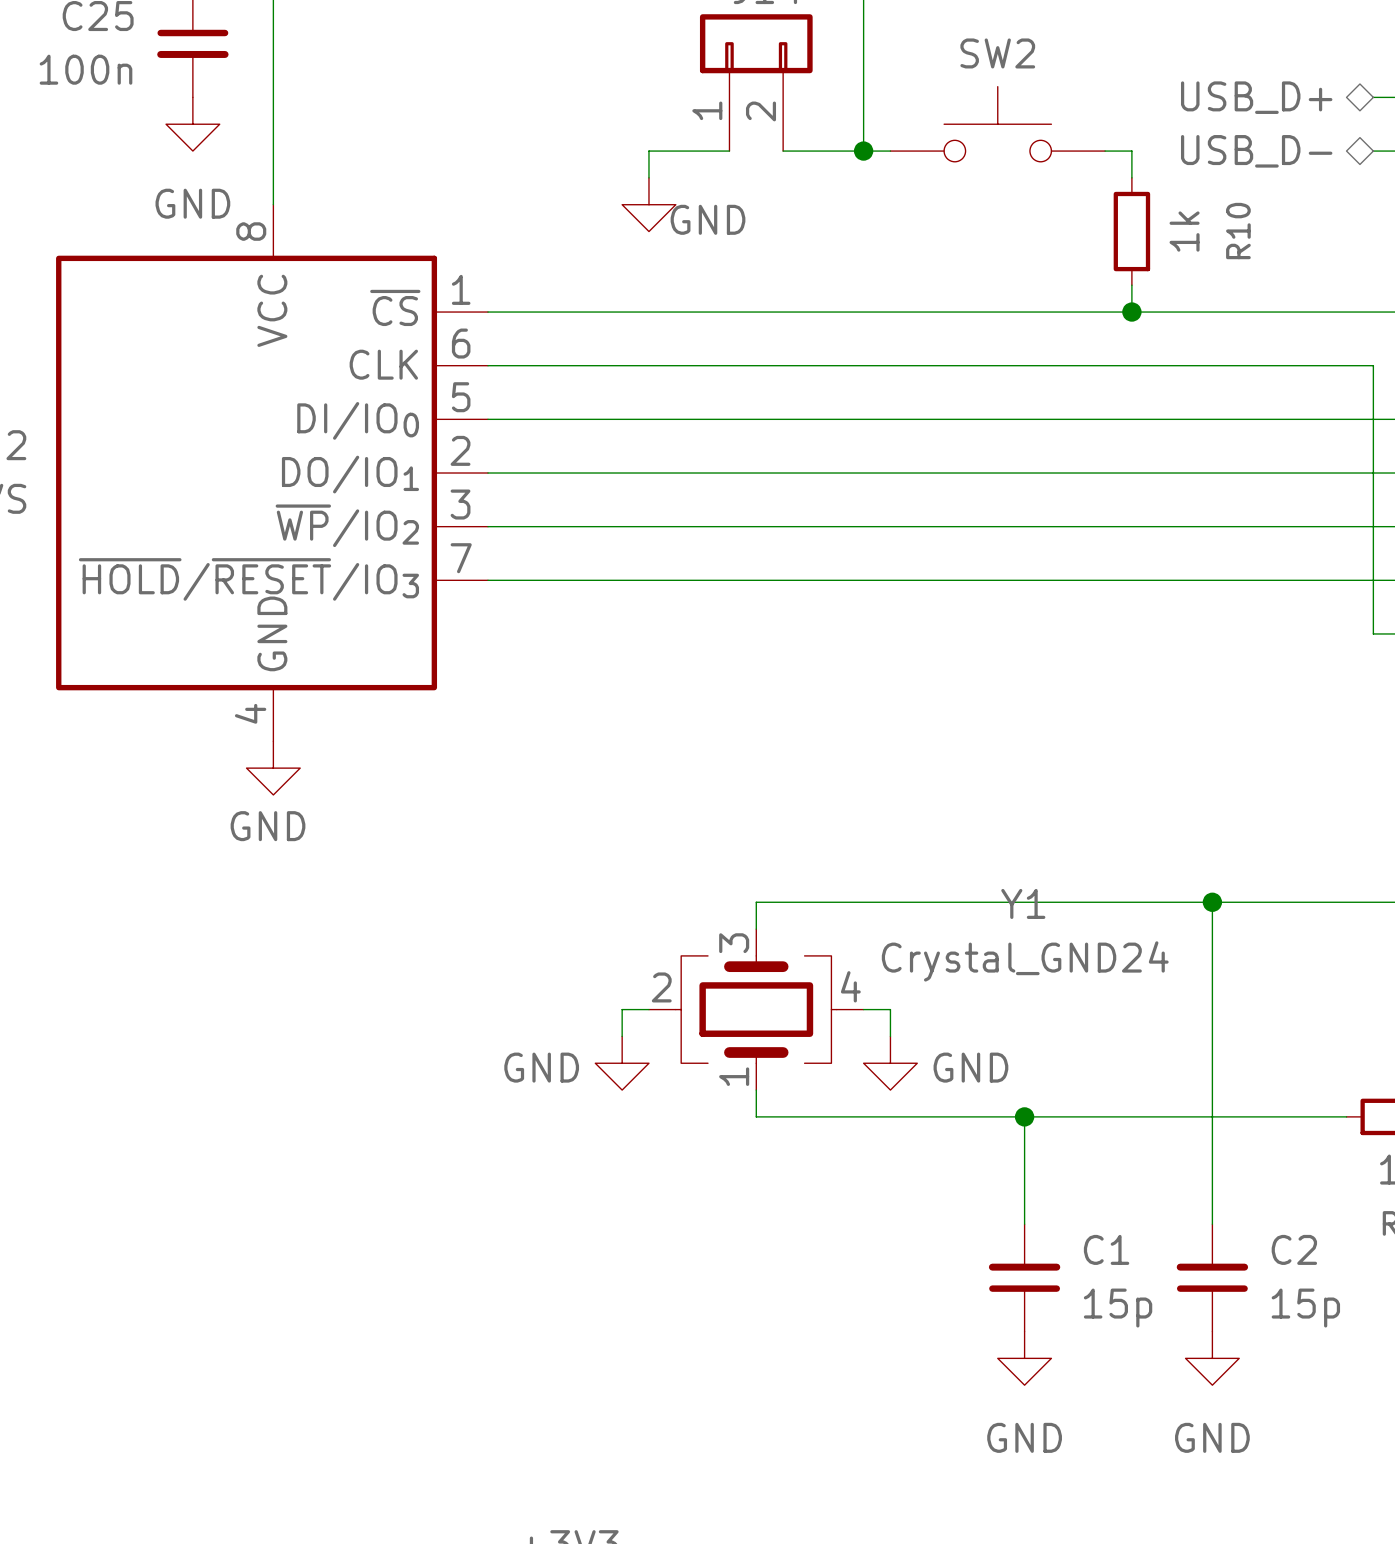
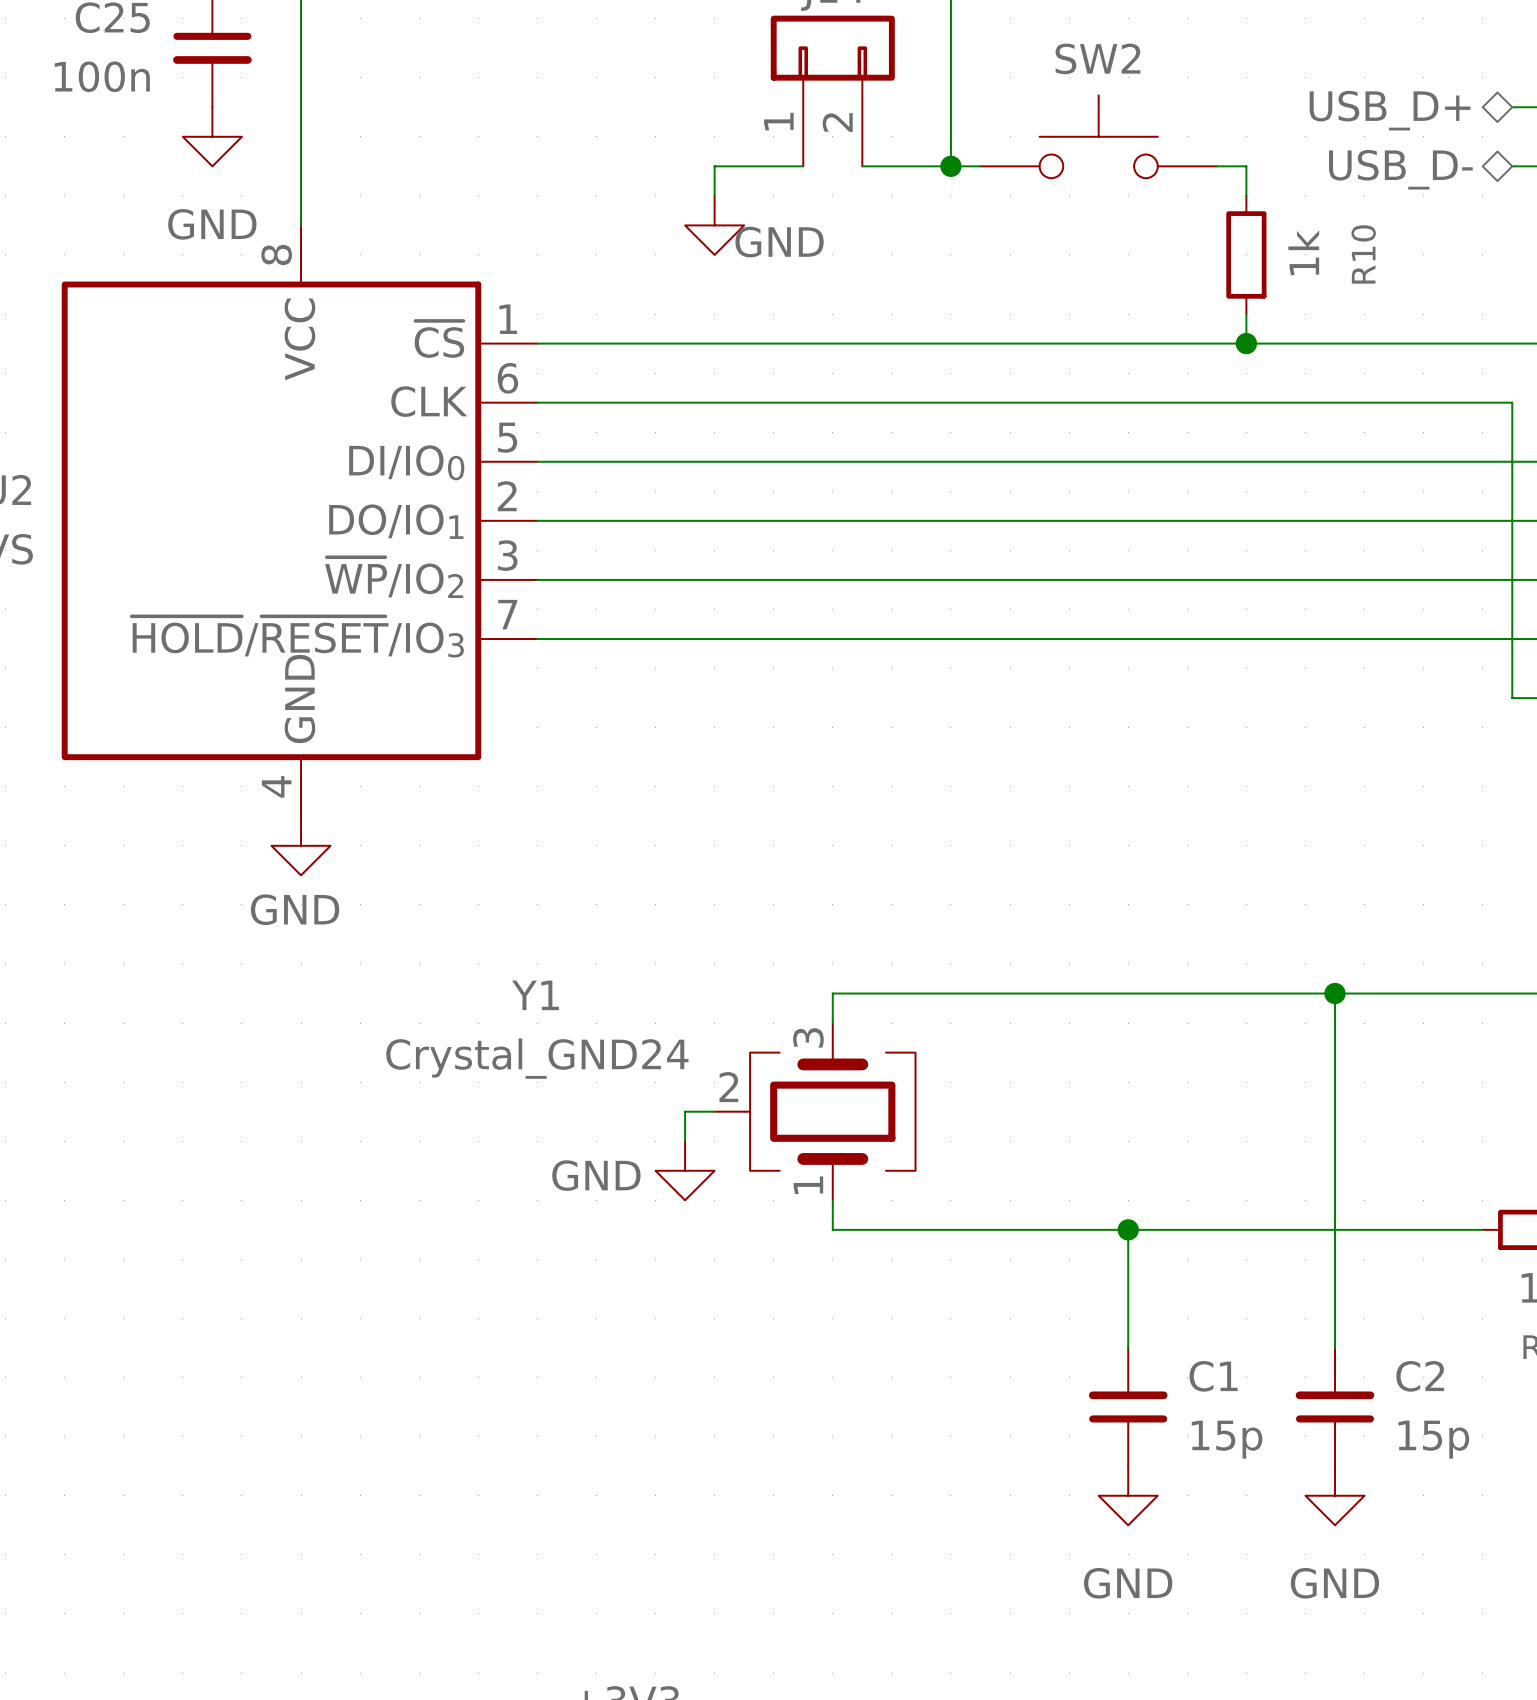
Y1 name position: Y1 (1023, 903) -> Y1 (535, 995)
Y1 symbol: [648, 929, 864, 1091] -> [714, 1023, 916, 1201]
Y1 value position: Crystal_GND24 (1025, 961) -> Crystal_GND24 (537, 1058)
wire: (863, 1009) (890, 1009) (890, 1036) -> none
power symbol: GND (890, 1063) -> none

